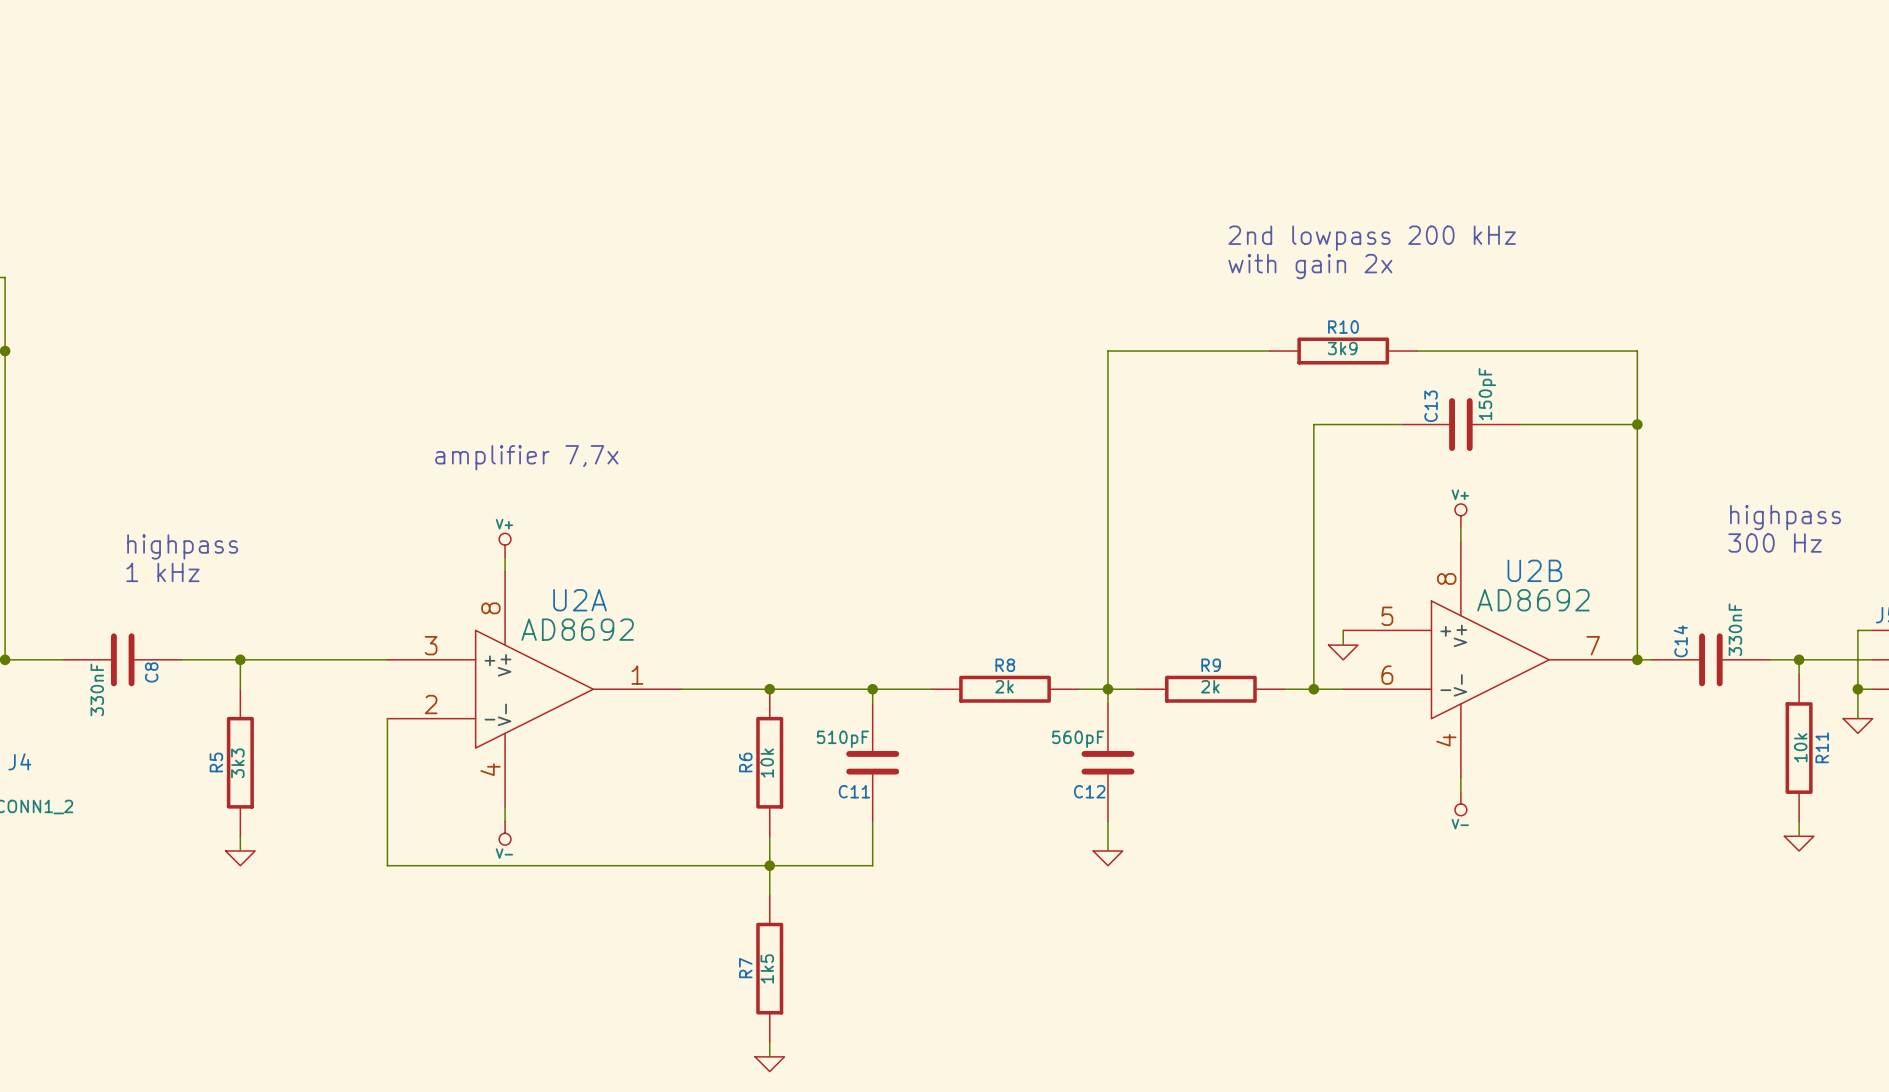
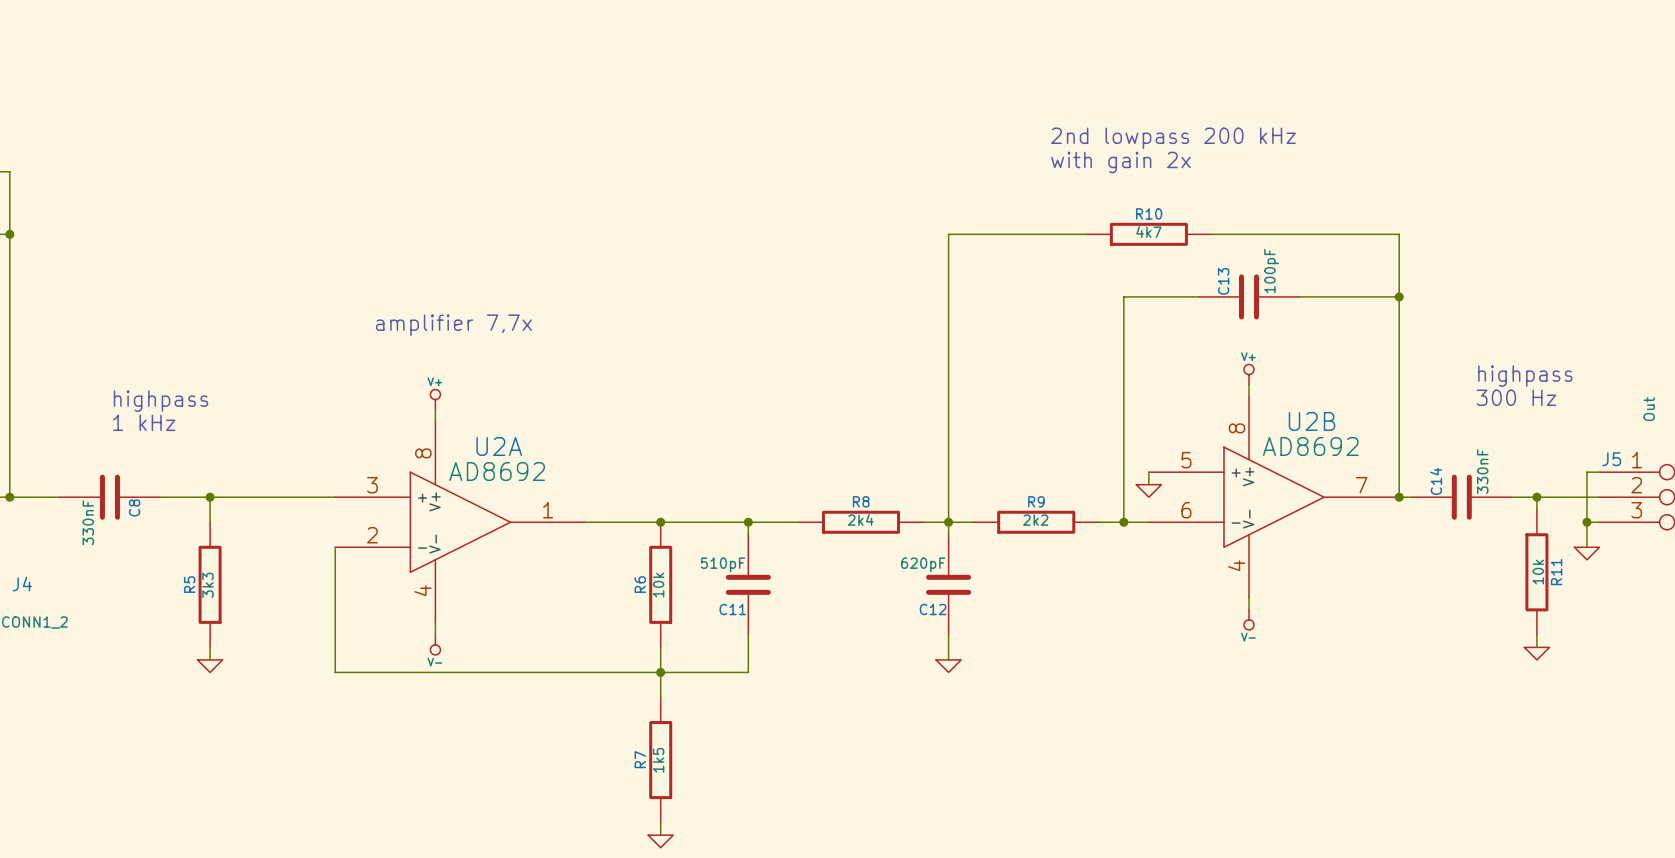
R10 value: 3k9 (1342, 348) -> 4k7 (1148, 231)
C13 value: 150pF (1487, 394) -> 100pF (1271, 271)
R8 value: 2k (1004, 686) -> 2k4 (860, 519)
R9 value: 2k (1210, 686) -> 2k2 (1035, 520)
C12 value: 560pF (1078, 739) -> 620pF (923, 564)

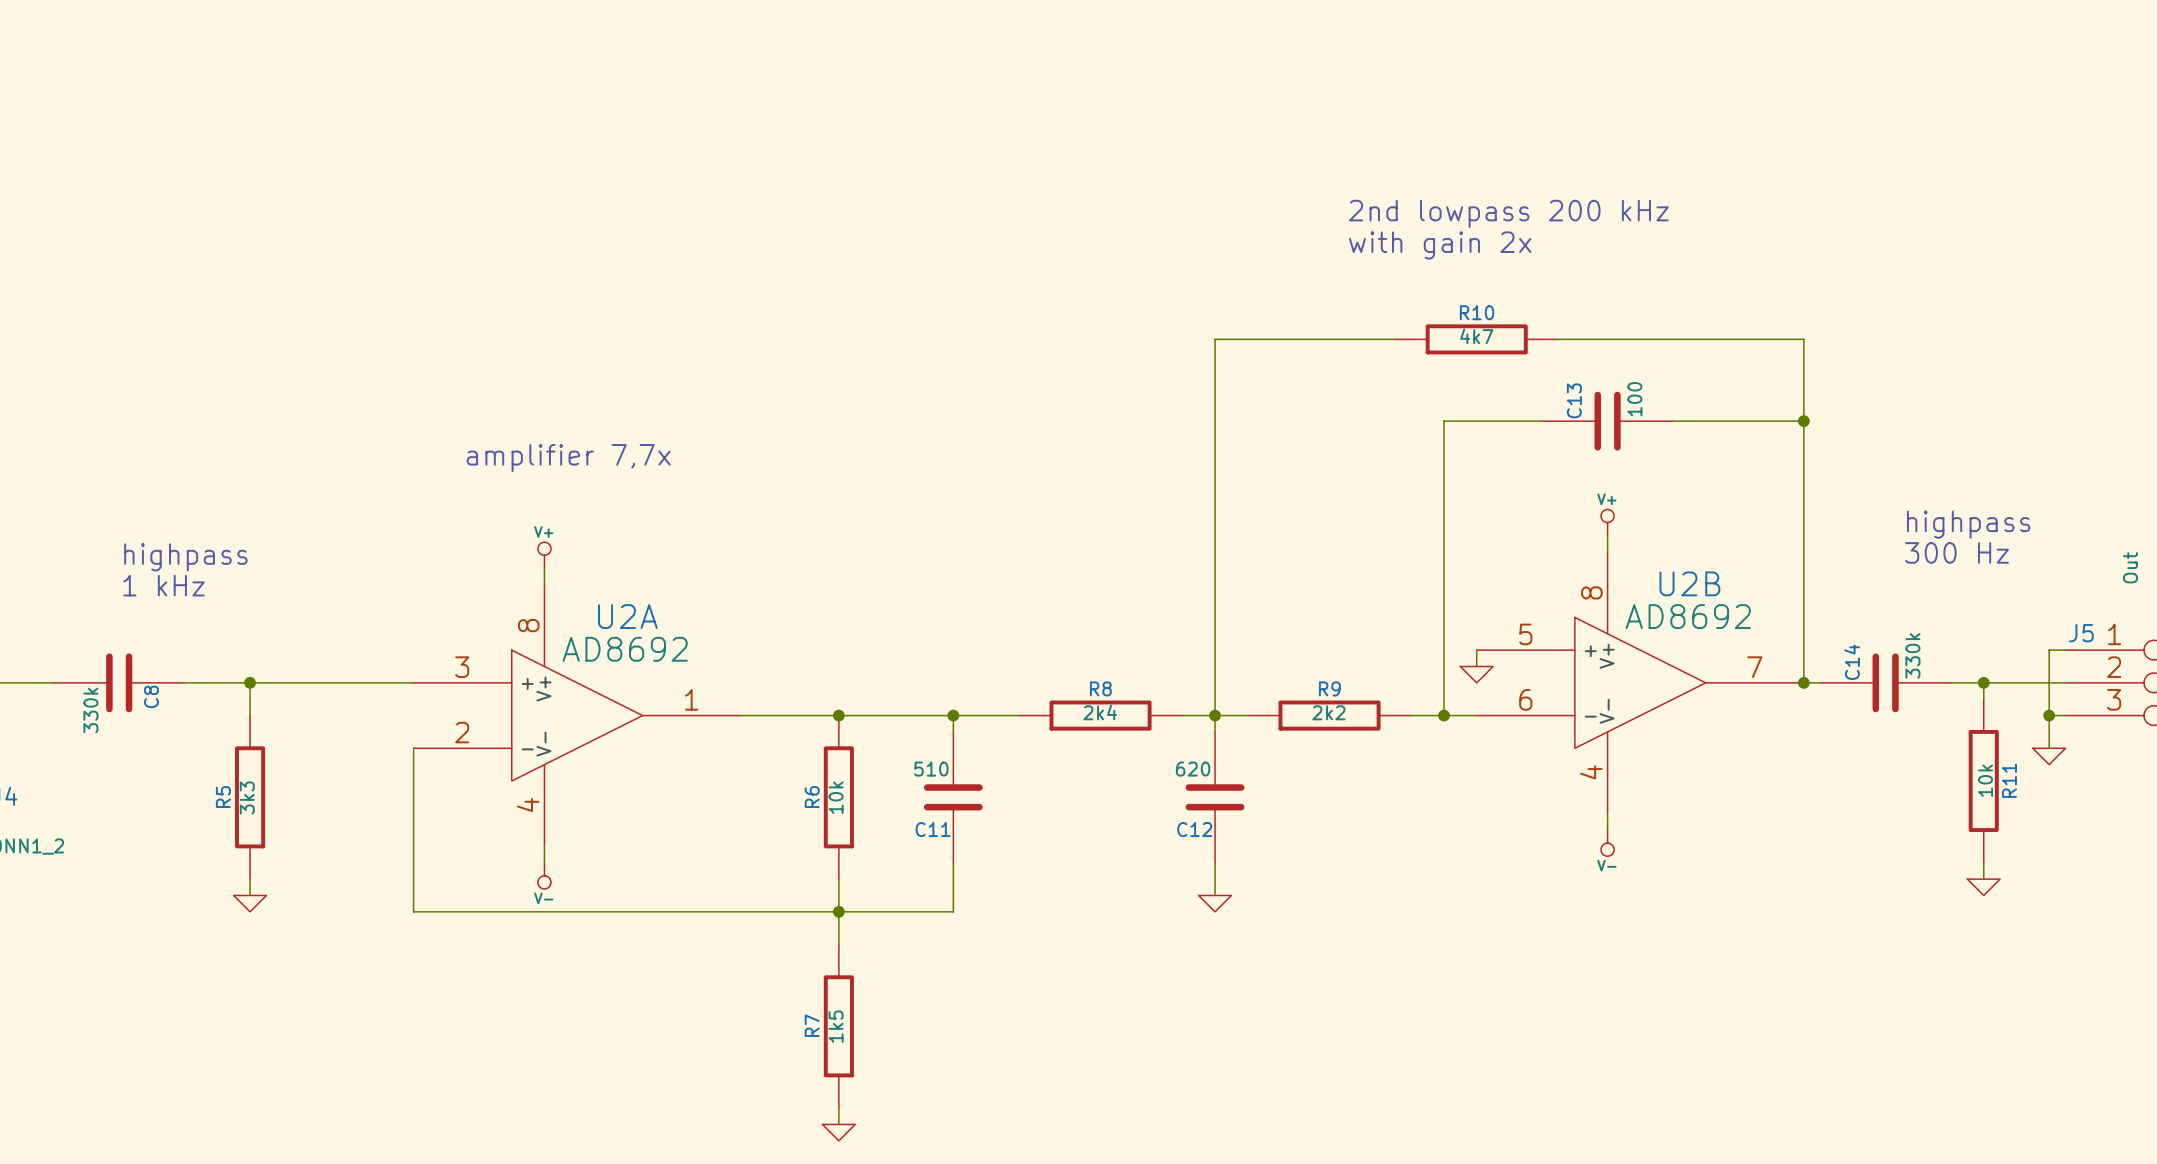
C13 value: 100pF (1271, 271) -> 100 (1634, 399)
C14 value: 330nF (1482, 471) -> 330k (1912, 655)
C8 value: 330nF (88, 522) -> 330k (90, 710)
C11 value: 510pF (722, 564) -> 510 (931, 769)
C12 value: 620pF (923, 564) -> 620 (1193, 769)

